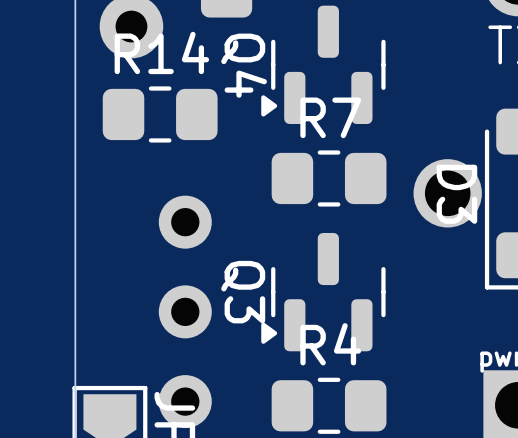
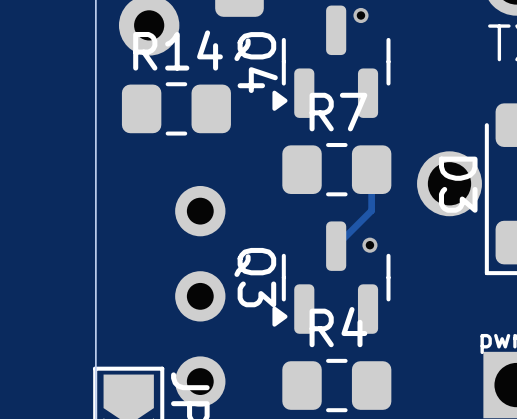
via: none -> (360, 15)
track: none -> (371, 169) (371, 210) (336, 246)
via: none -> (369, 245)

